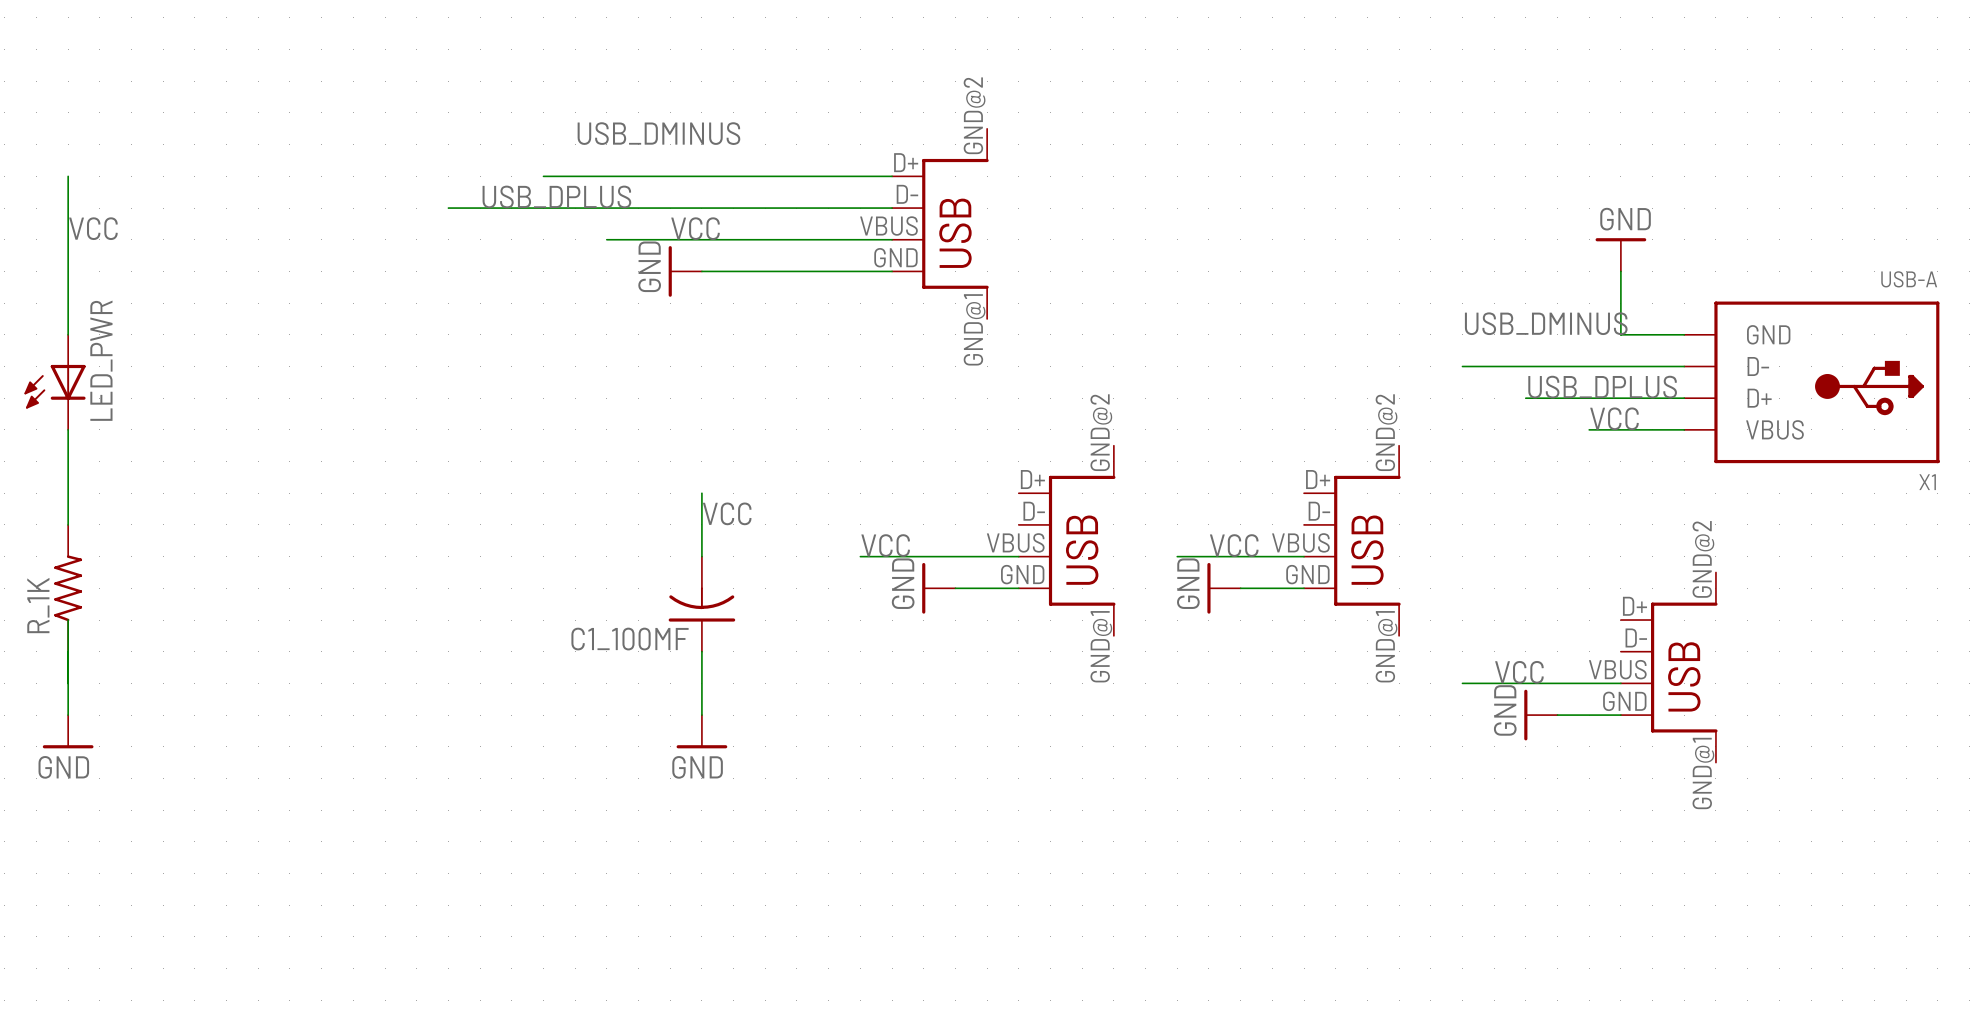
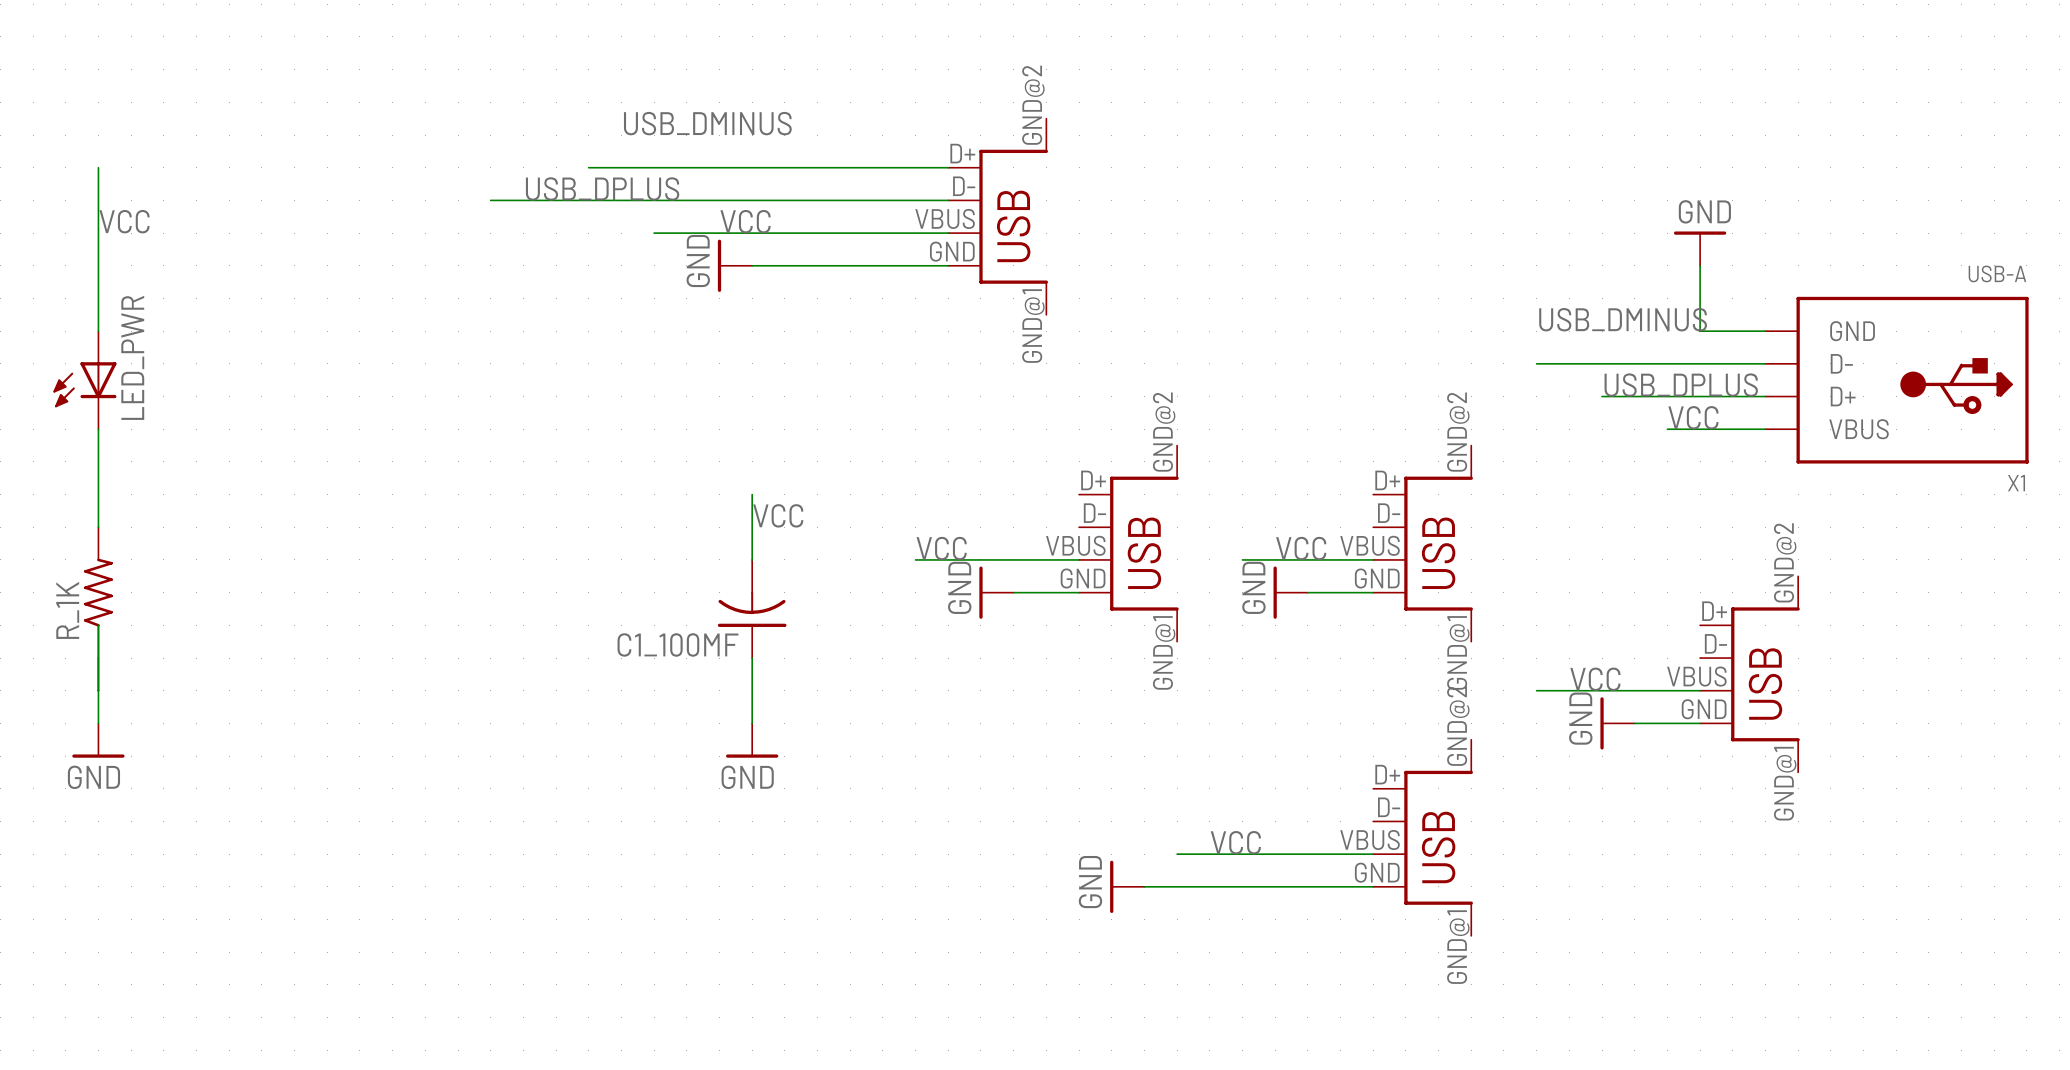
part: none -> (1423, 837)
label: none -> VCC (1235, 842)
wire: none -> (1177, 854) (1373, 854)
power symbol: none -> GND (1127, 886)
wire: none -> (1144, 886) (1373, 886)

